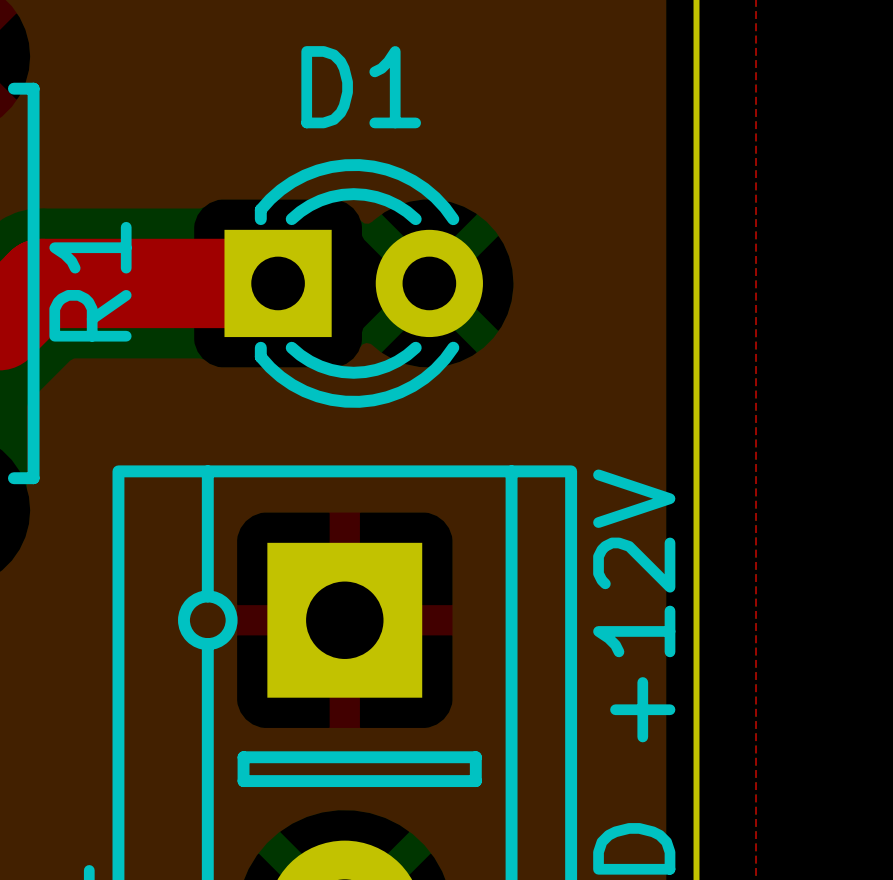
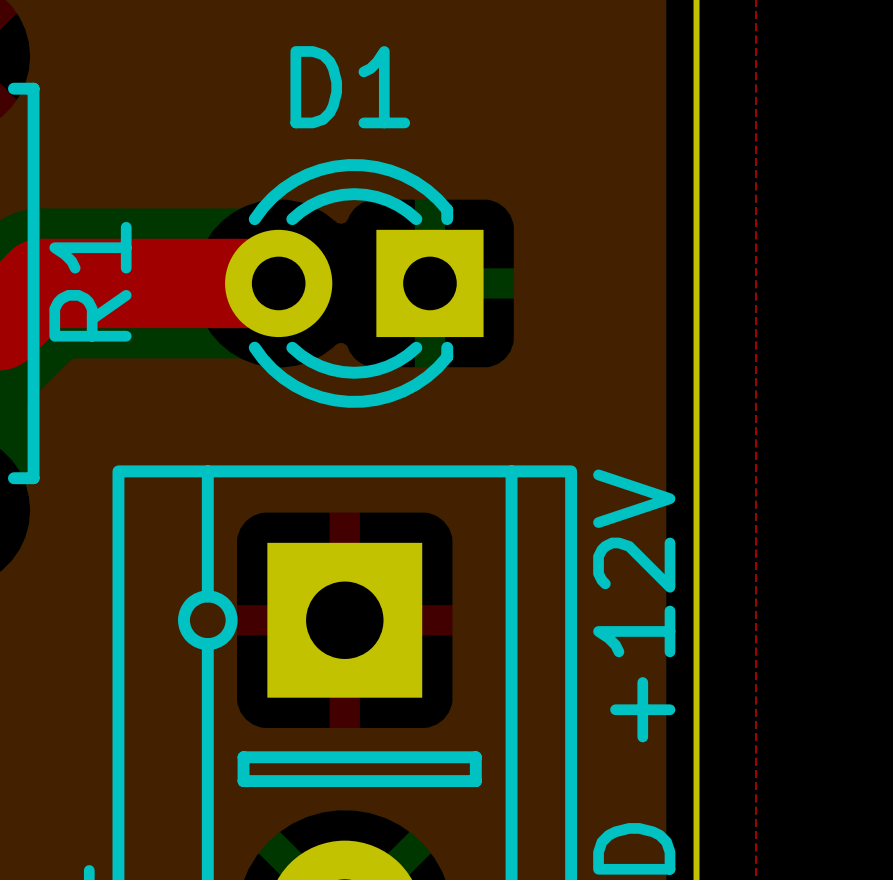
D1 rotation: 0° (353, 283) -> 180° (354, 283)

